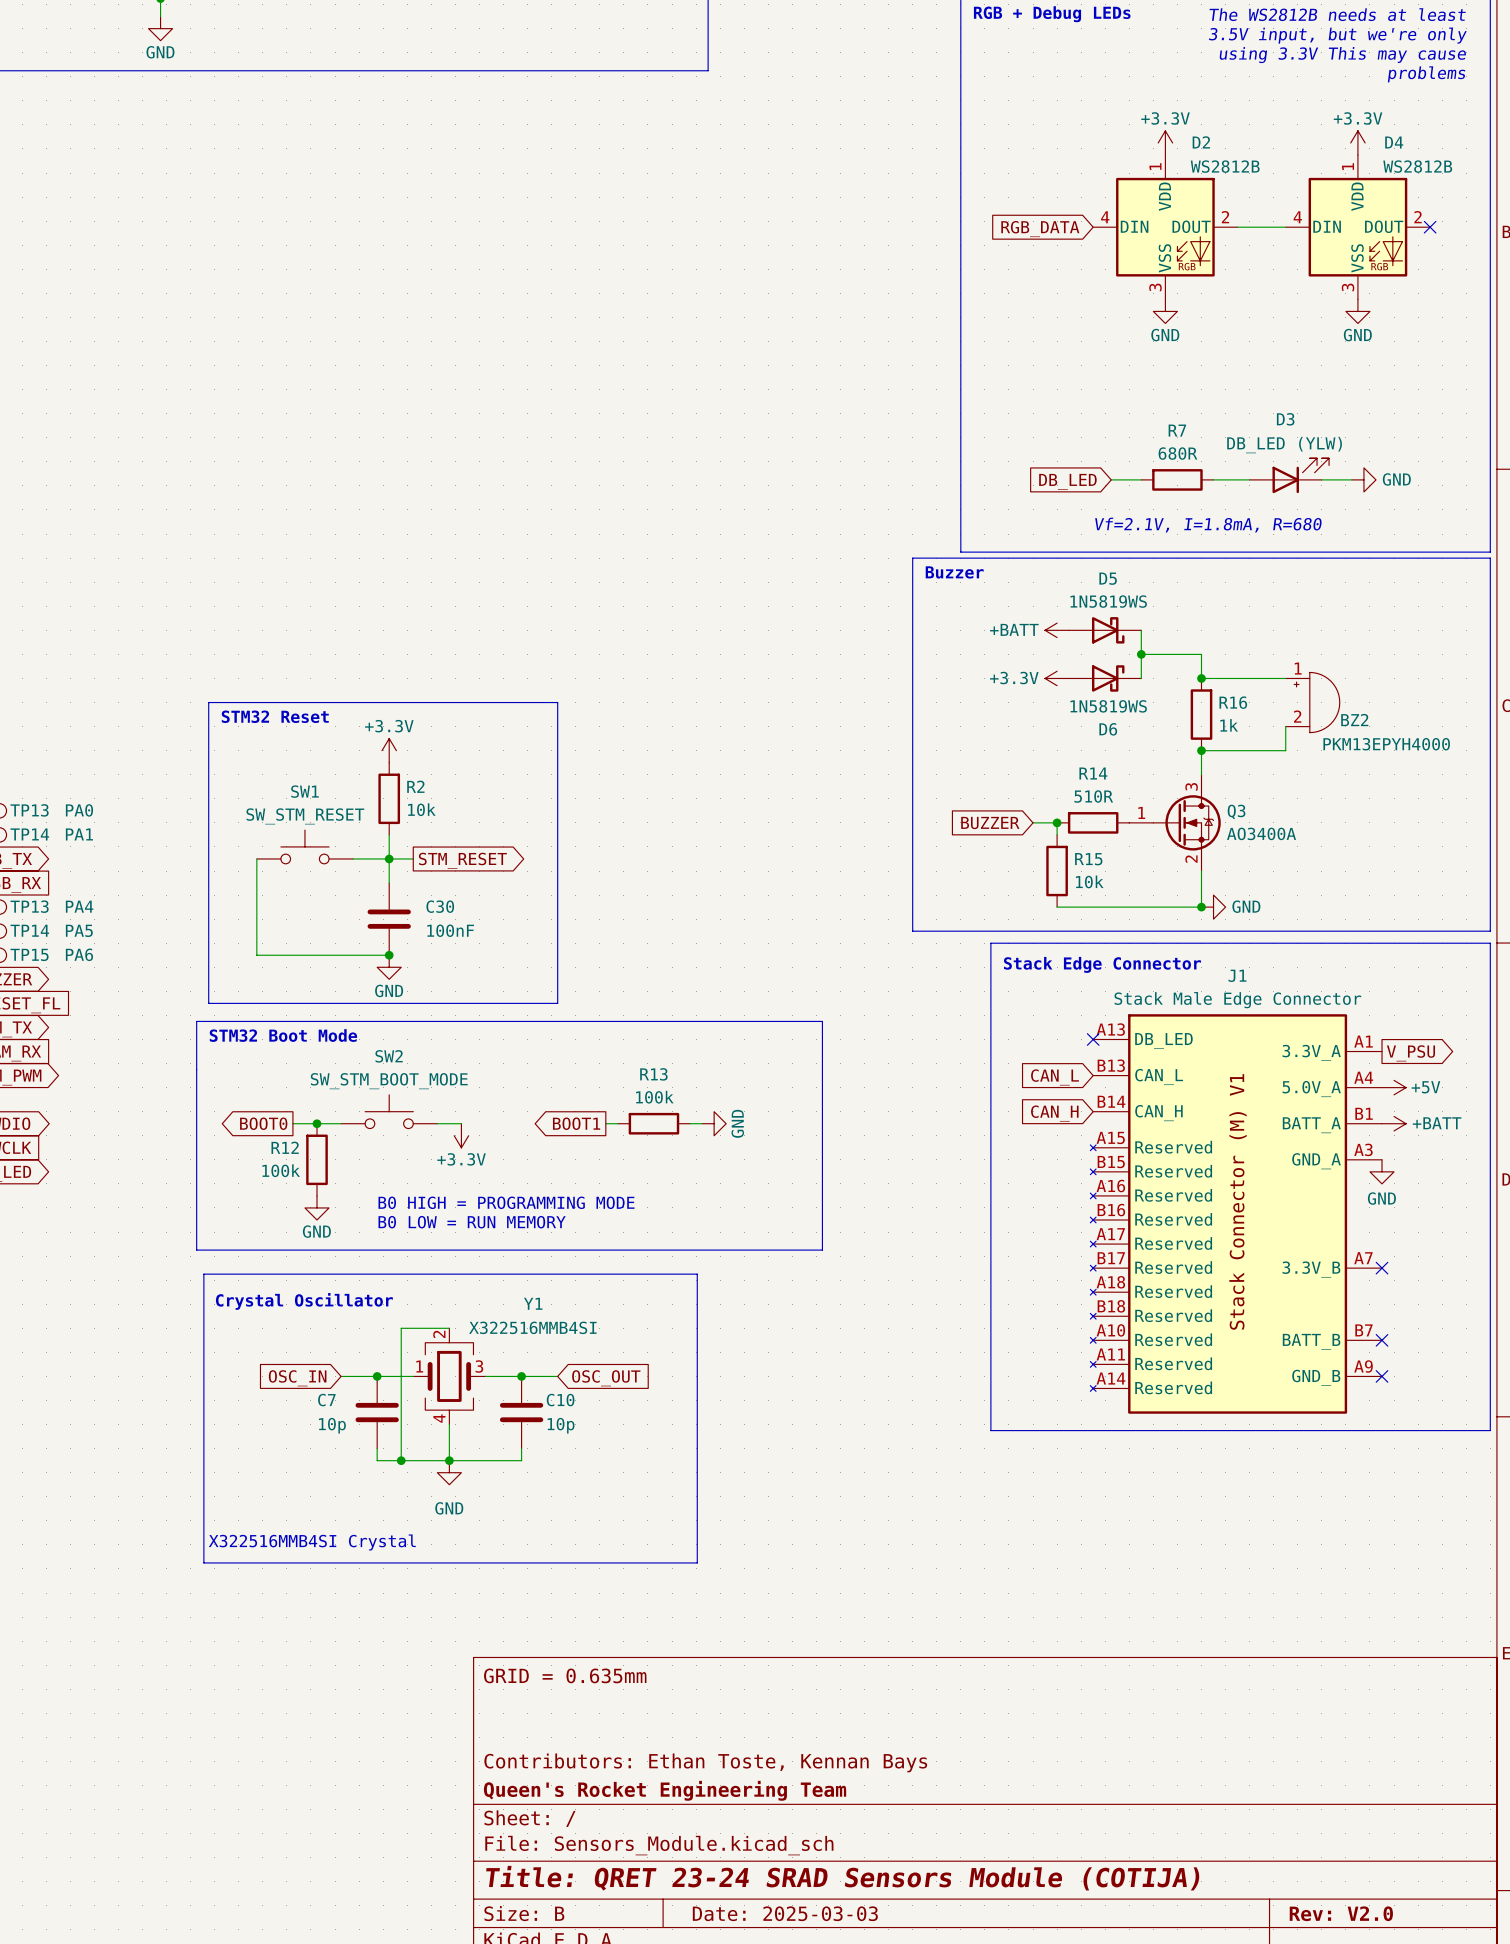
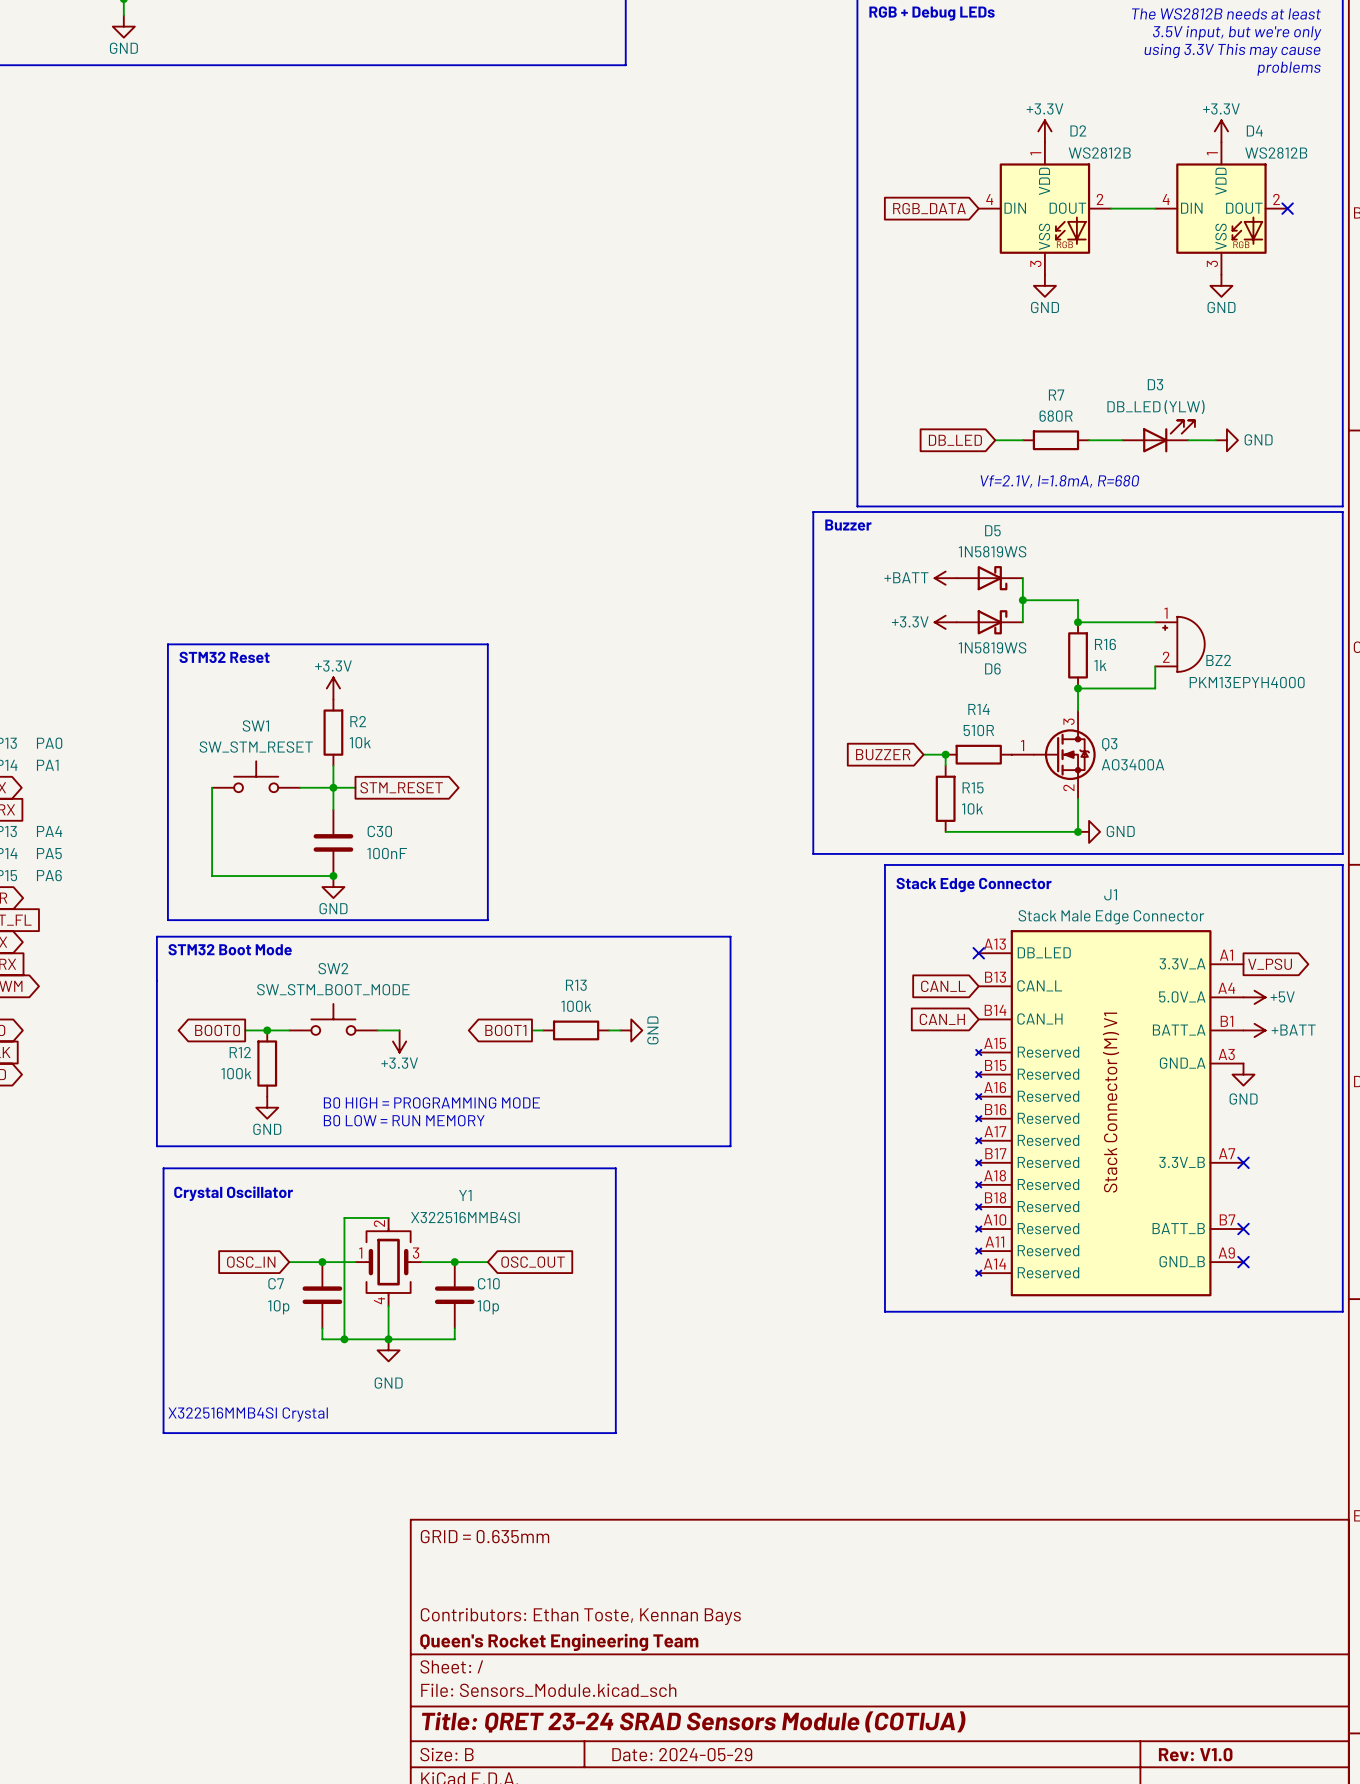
title block: Date: 2025-03-03 (785, 1913) -> Date: 2024-05-29 (682, 1754)
title block: Rev: V2.0 (1341, 1913) -> Rev: V1.0 (1195, 1754)

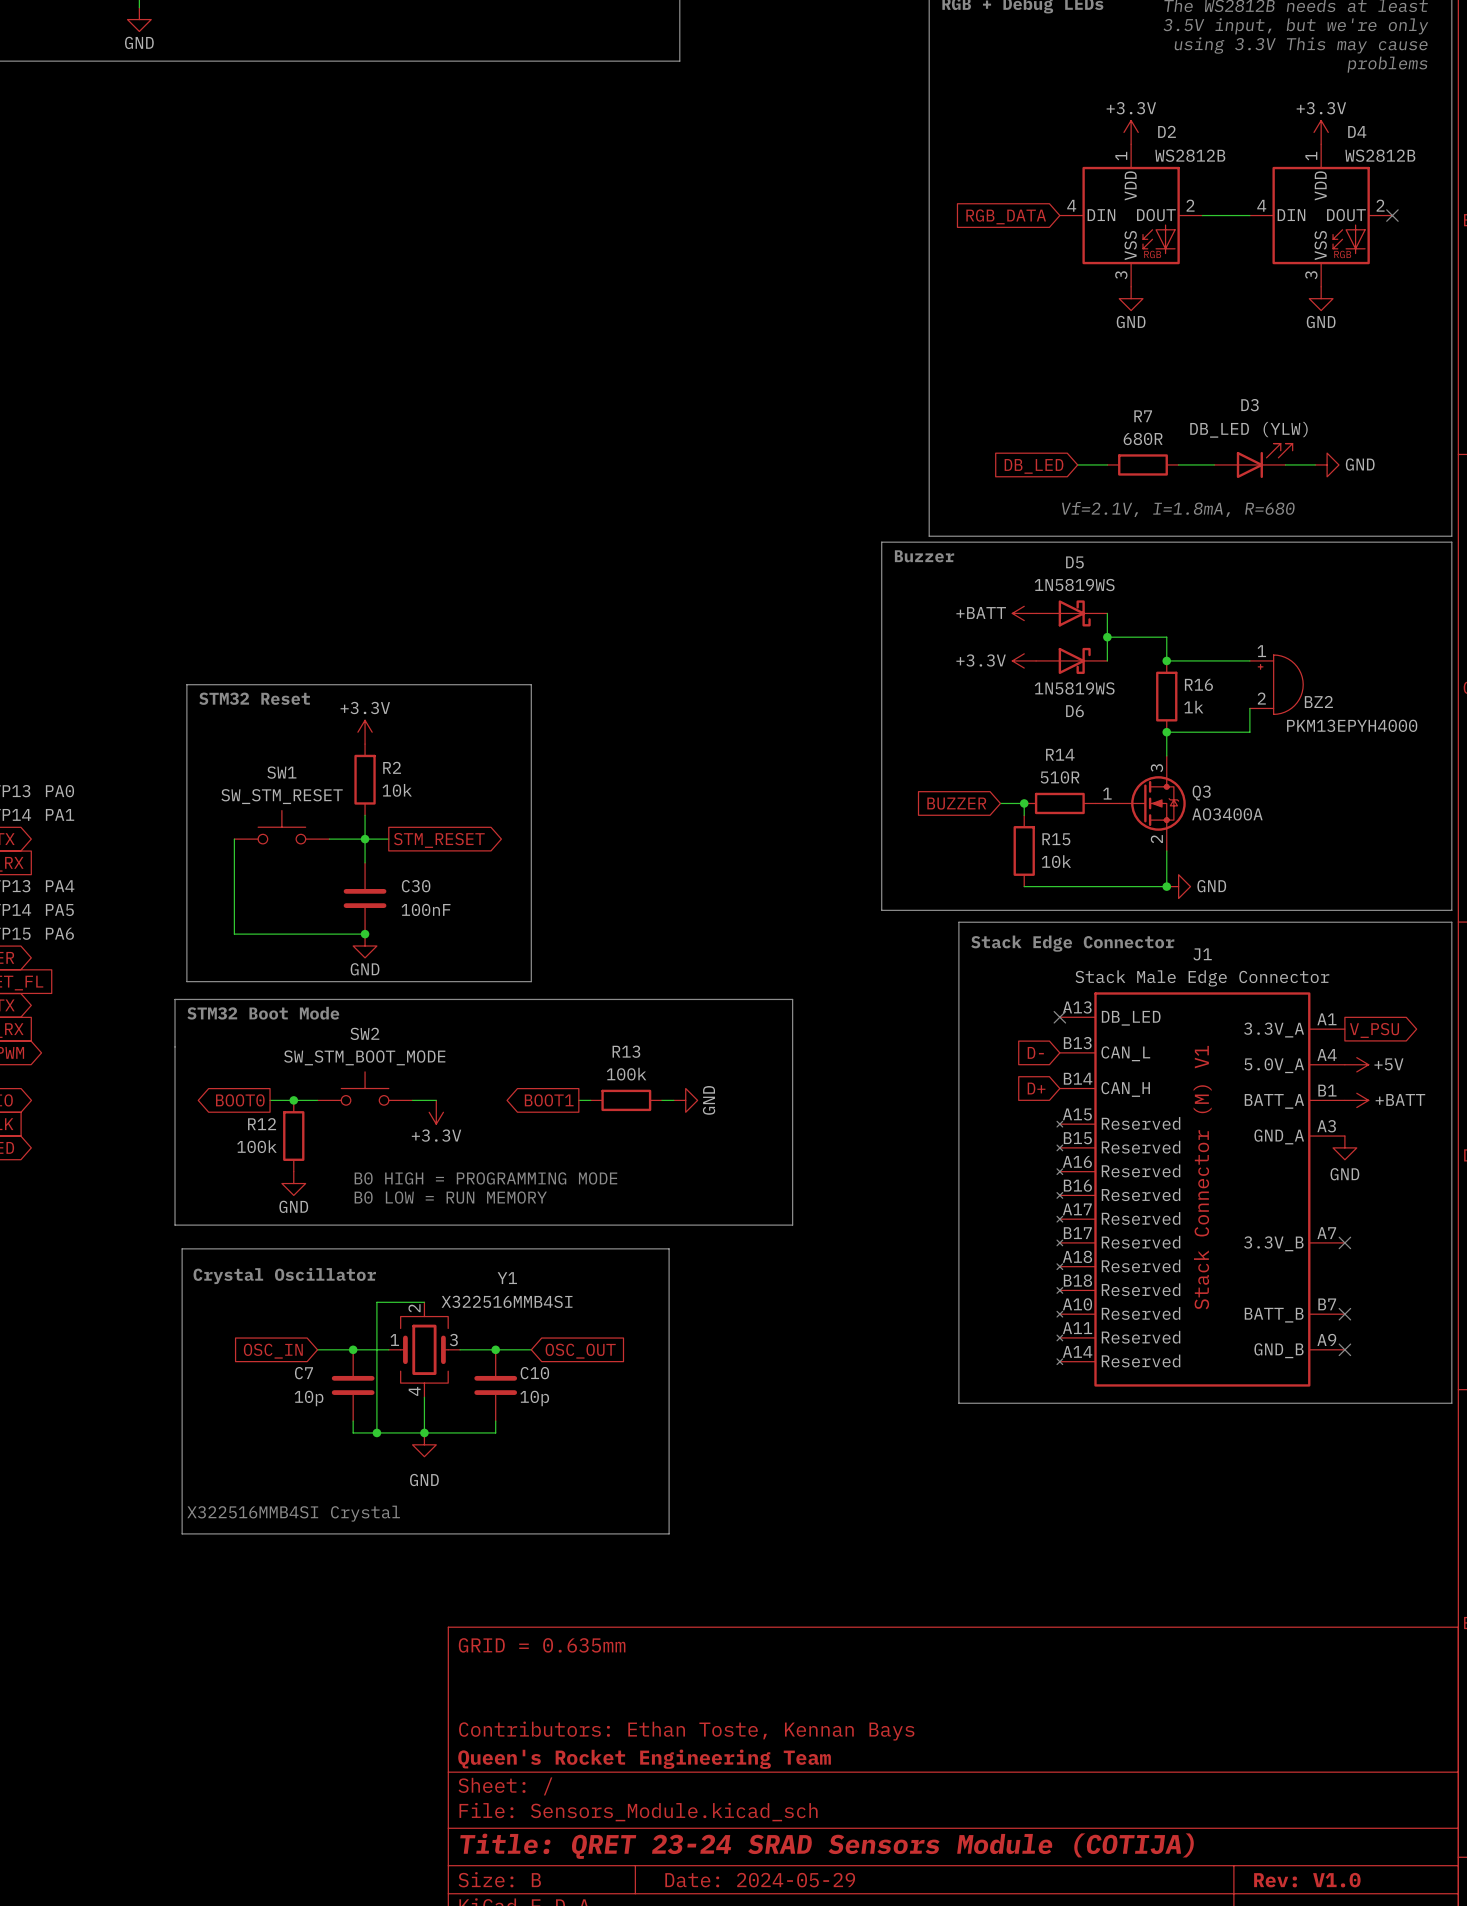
global label: CAN_L (943, 986) -> D- (1035, 1052)
global label: CAN_H (942, 1019) -> D+ (1036, 1088)

